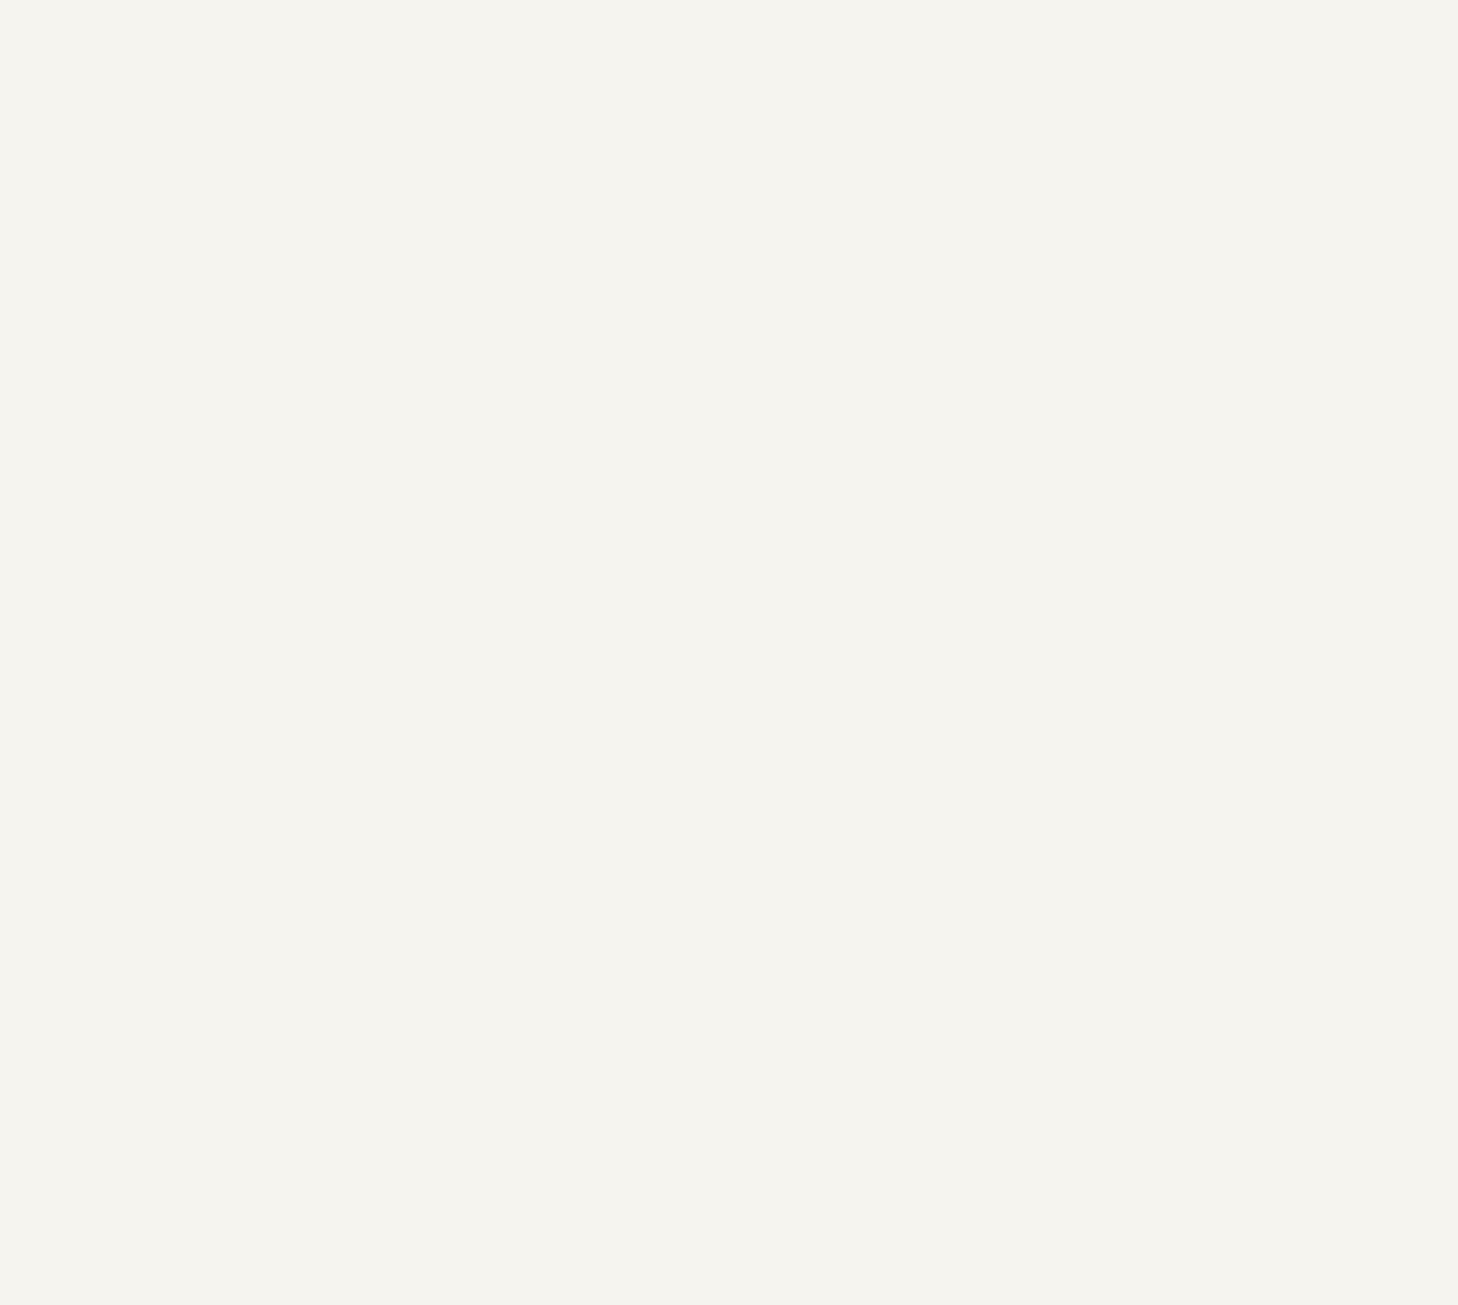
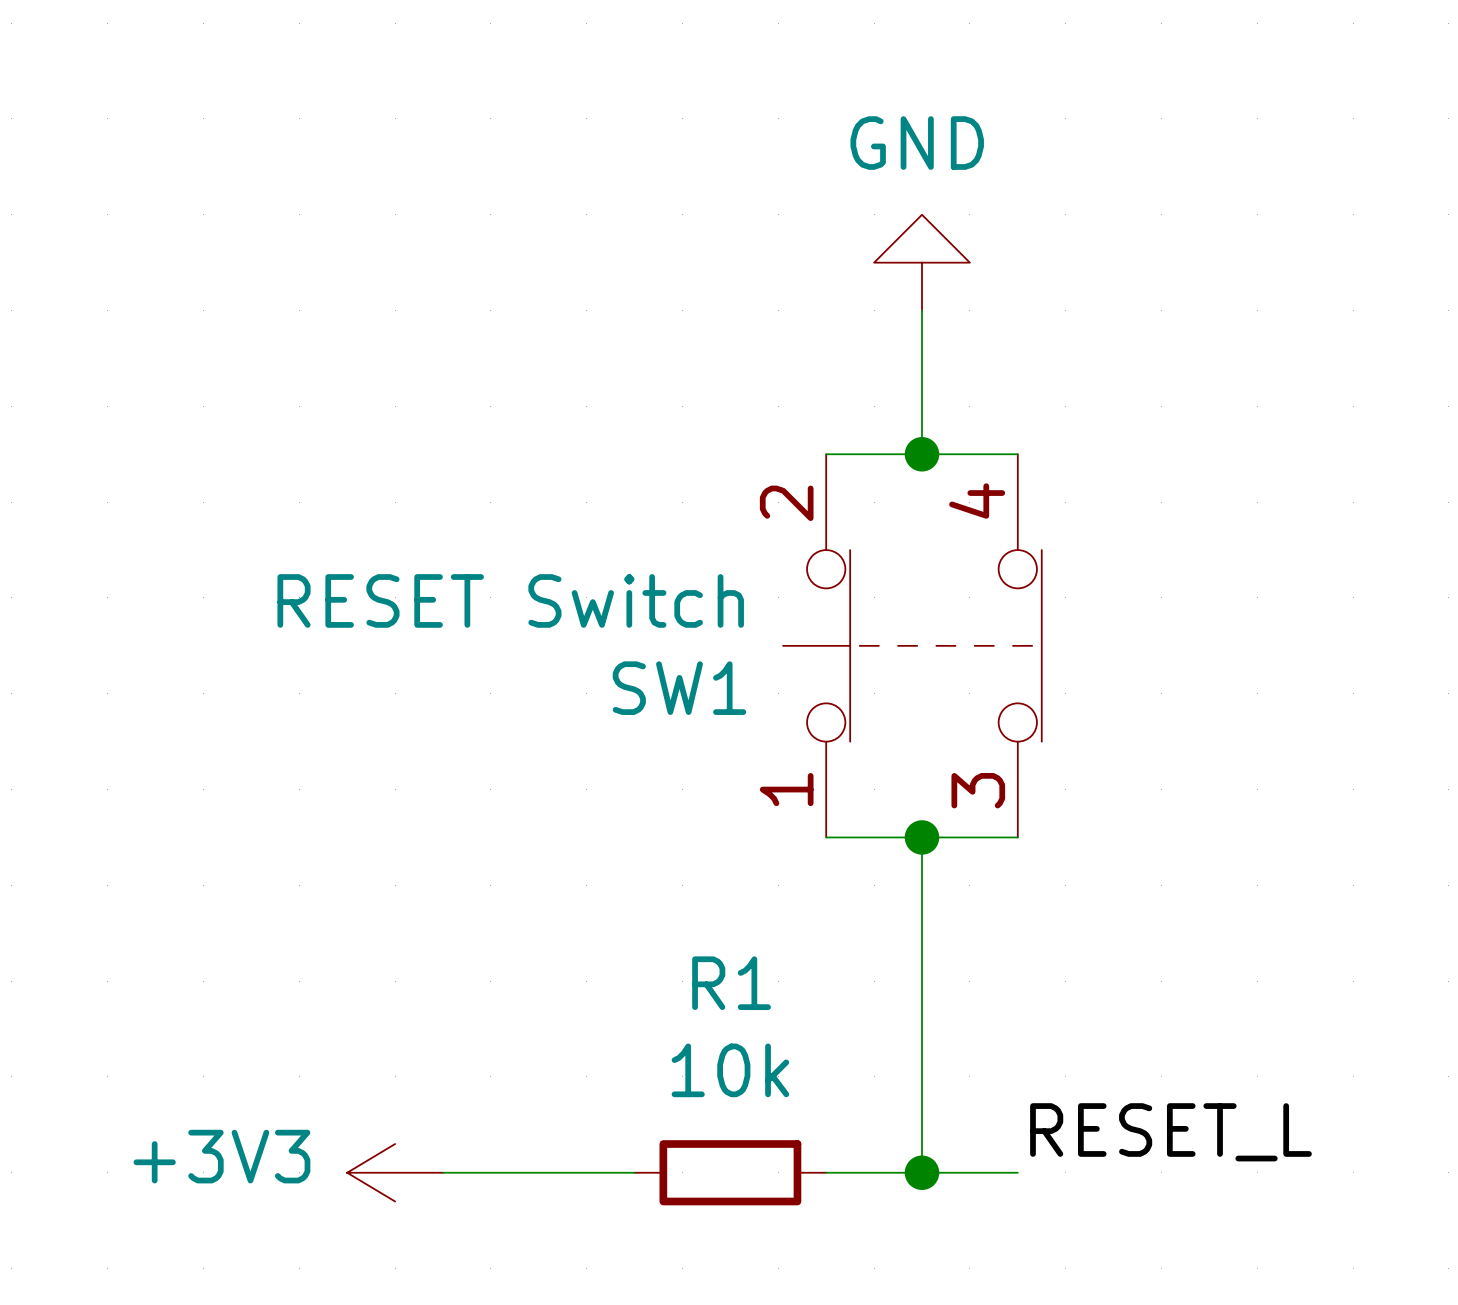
power symbol: none -> GND (922, 262)
wire: none -> (922, 310) (922, 454)
wire: none -> (826, 454) (1017, 454)
junction: none -> (922, 454)
SW1: none -> RESET Switch (912, 645)
wire: none -> (826, 837) (1017, 837)
wire: none -> (922, 837) (922, 1172)
junction: none -> (922, 837)
label: none -> RESET_L (1170, 1132)
power symbol: none -> +3V3 (395, 1172)
wire: none -> (443, 1172) (634, 1172)
R1: none -> 10k (730, 1172)
wire: none -> (826, 1172) (1017, 1172)
junction: none -> (922, 1172)

